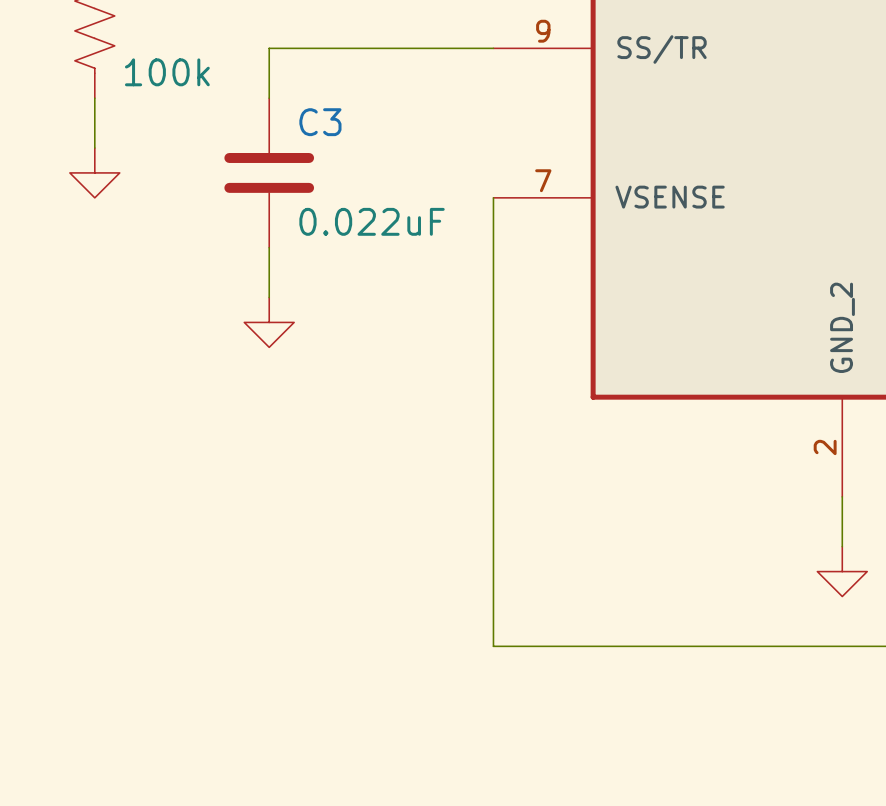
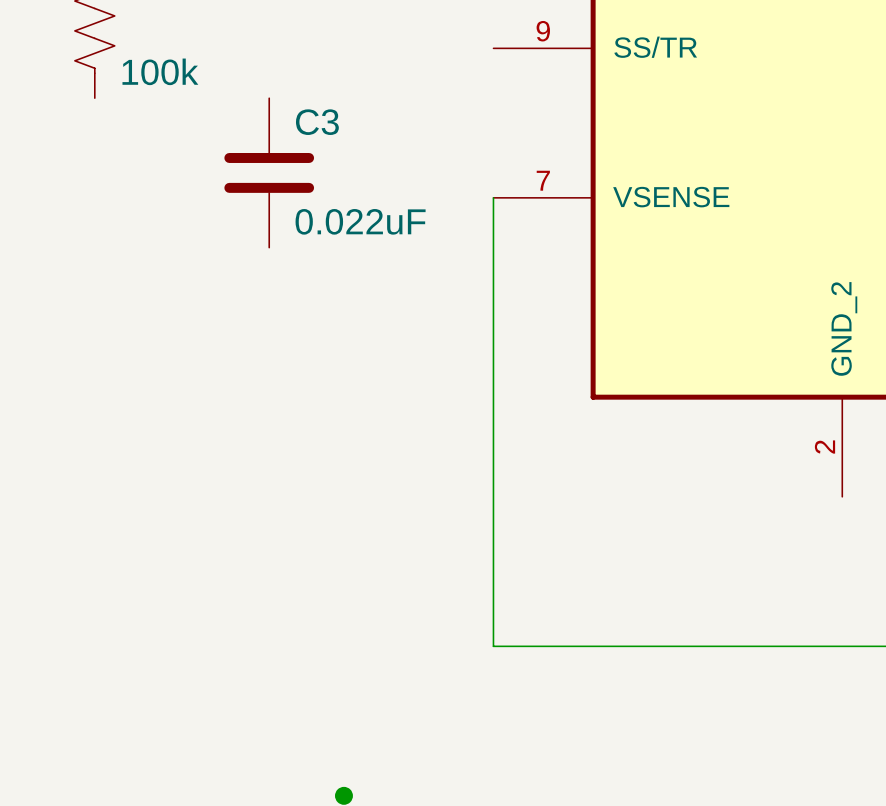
wire: (493, 48) (269, 48) (269, 98) -> none
wire: (94, 98) (94, 148) -> none
power symbol: (94, 172) -> none
wire: (269, 247) (269, 297) -> none
power symbol: (269, 322) -> none
wire: (842, 496) (842, 546) -> none
power symbol: (842, 571) -> none
junction: none -> (343, 795)

